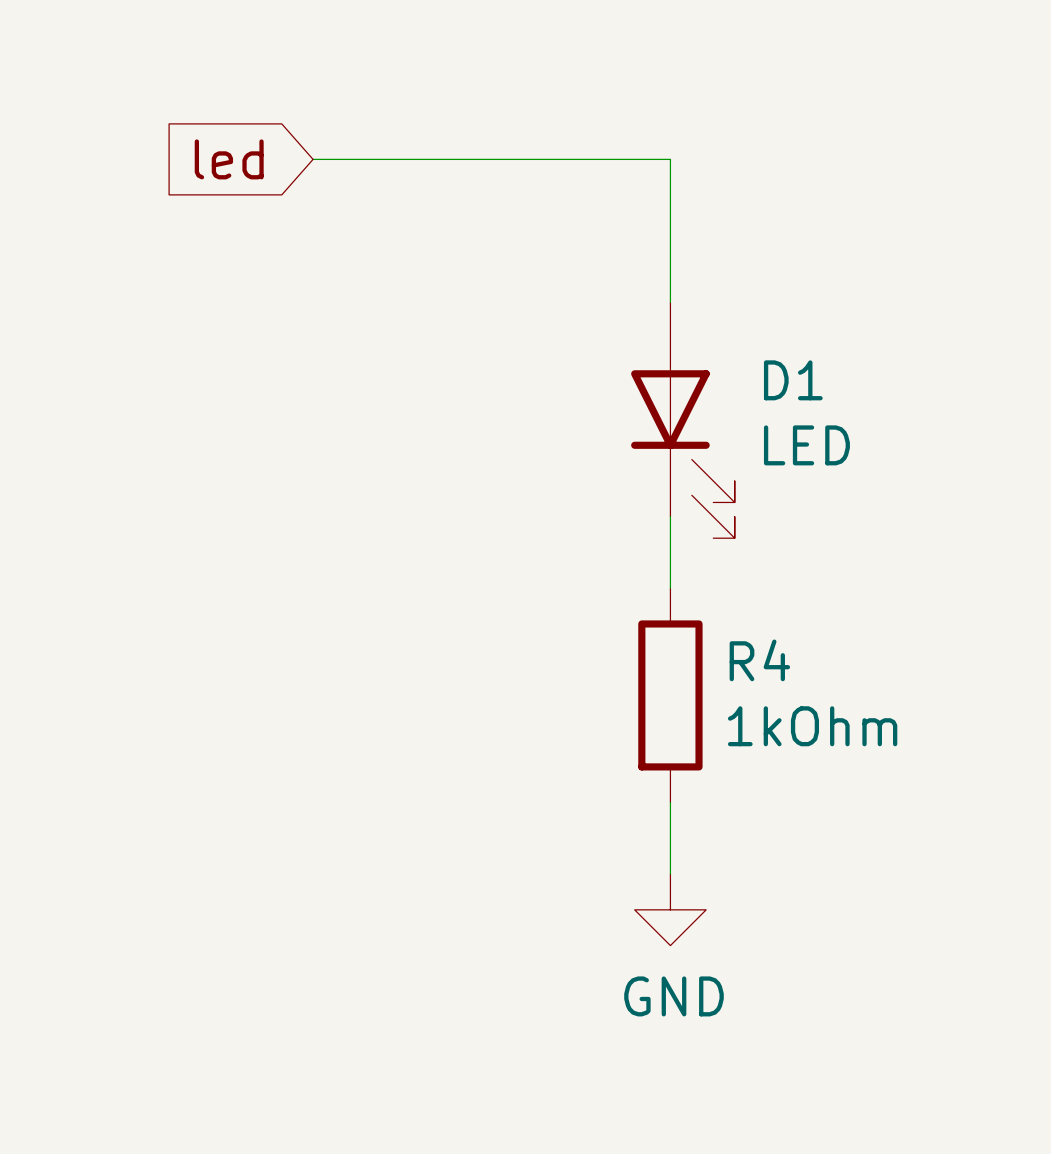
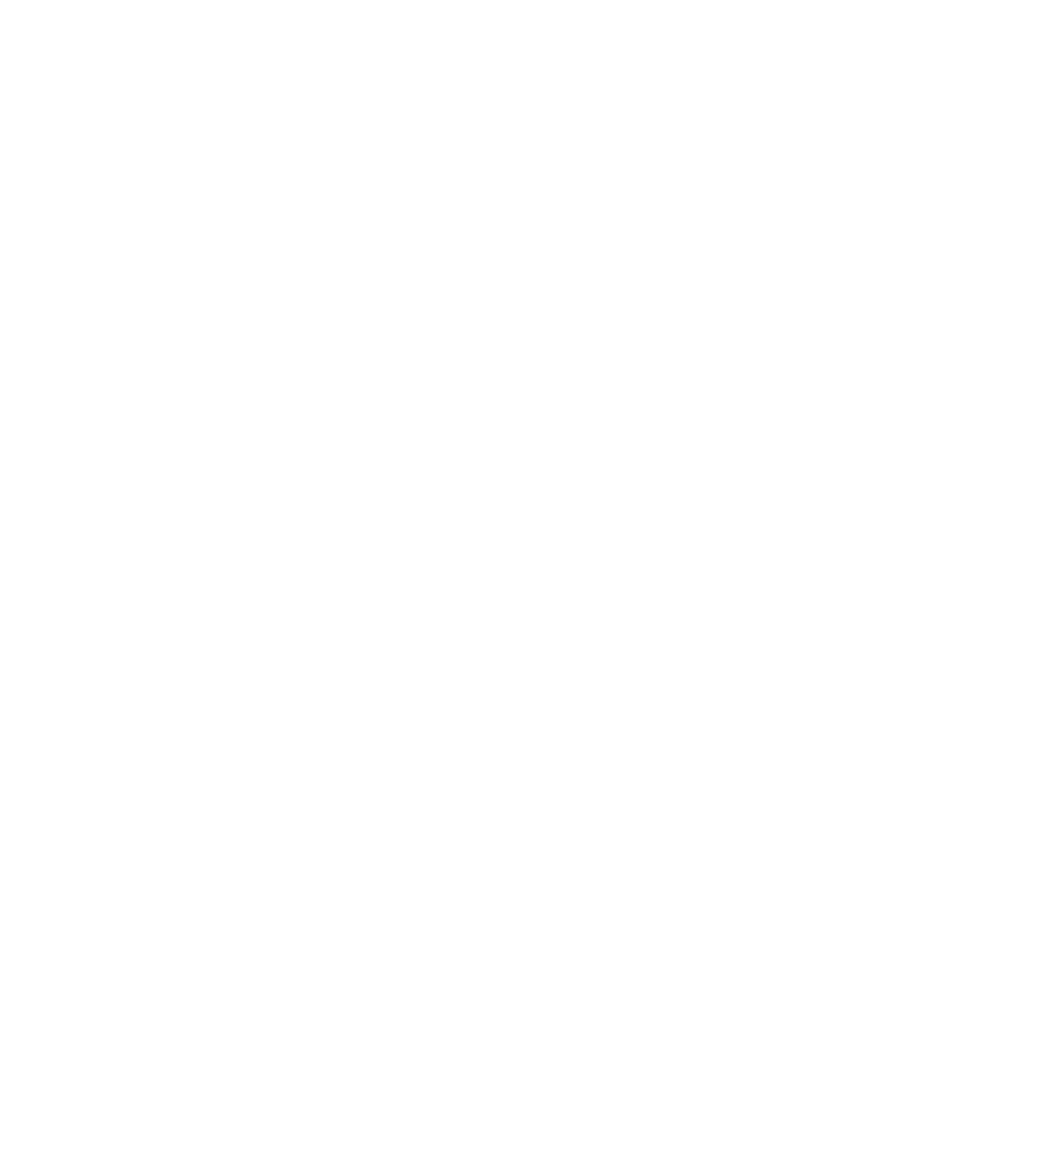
global label: led (229, 159) -> none
wire: (313, 159) (670, 159) (670, 302) -> none
D1: LED (682, 420) -> none
wire: (670, 516) (670, 588) -> none
R4: 1kOhm (670, 695) -> none
wire: (670, 802) (670, 874) -> none
power symbol: GND (670, 909) -> none

